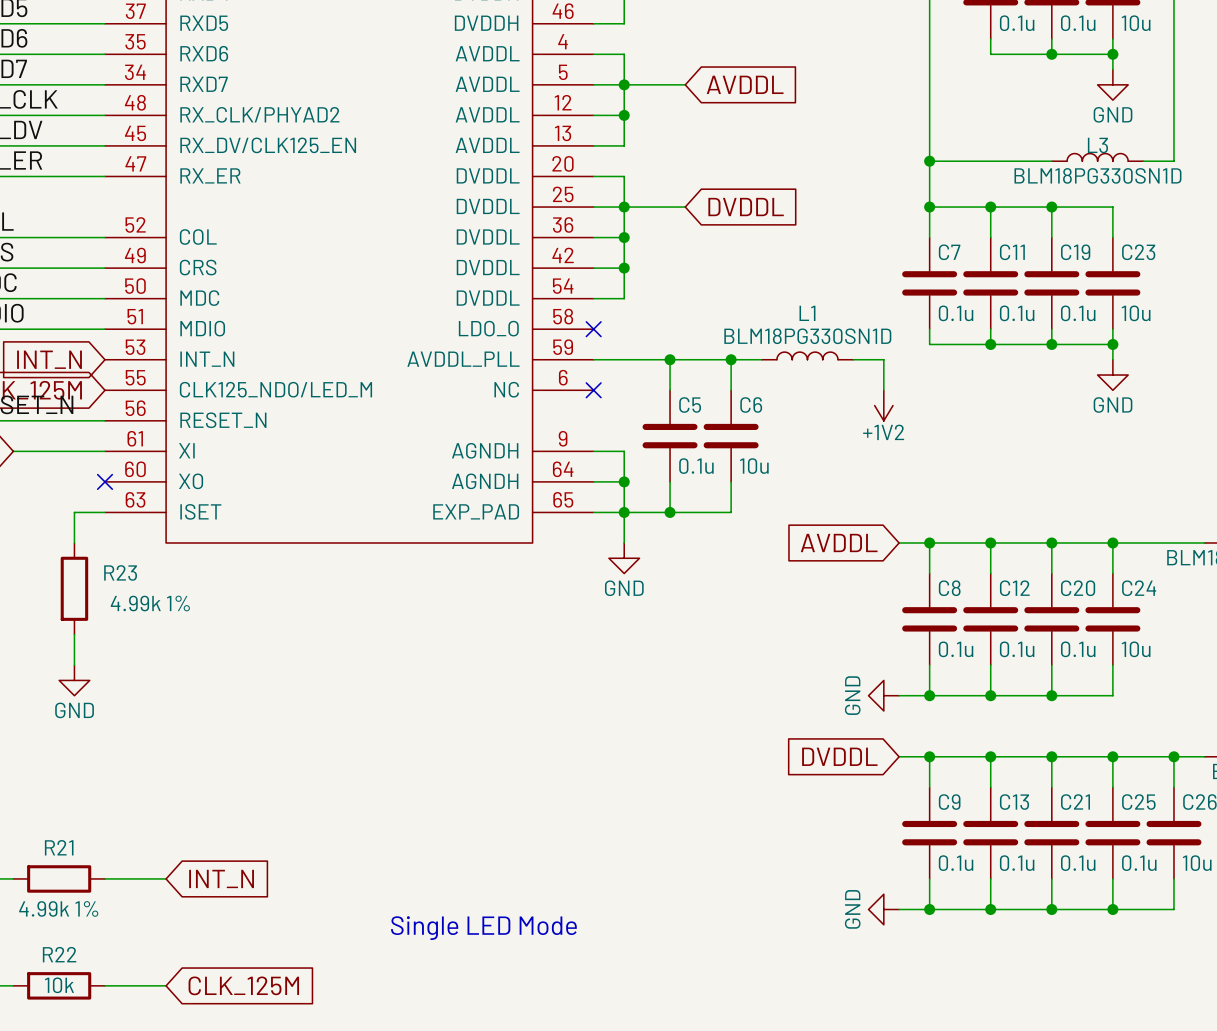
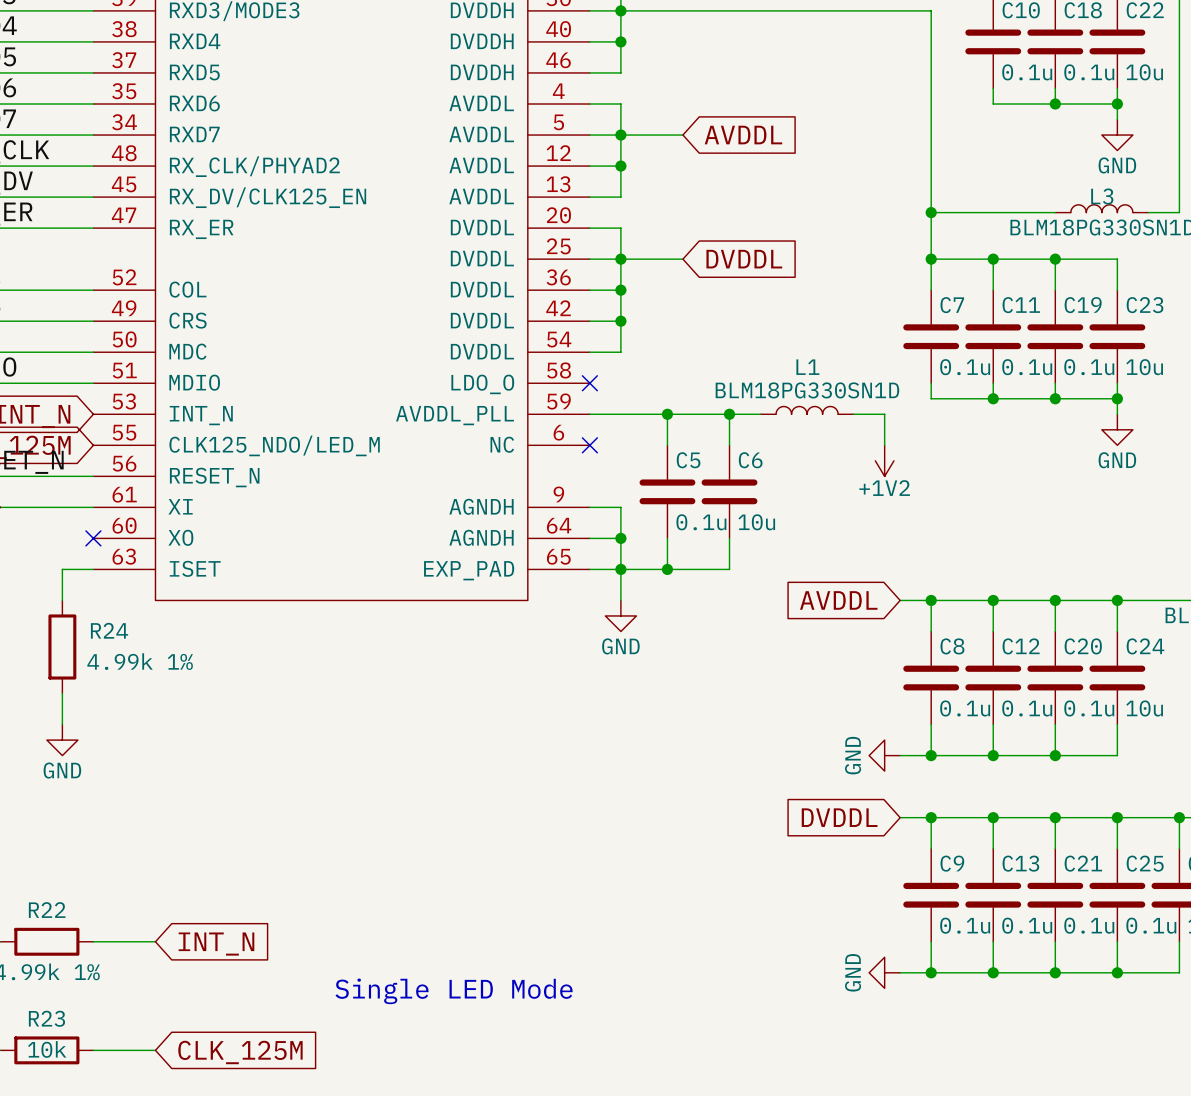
R23 name: R23 (120, 572) -> R24 (109, 630)
R21 name: R21 (59, 847) -> R22 (47, 910)
R22 name: R22 (59, 954) -> R23 (46, 1018)

